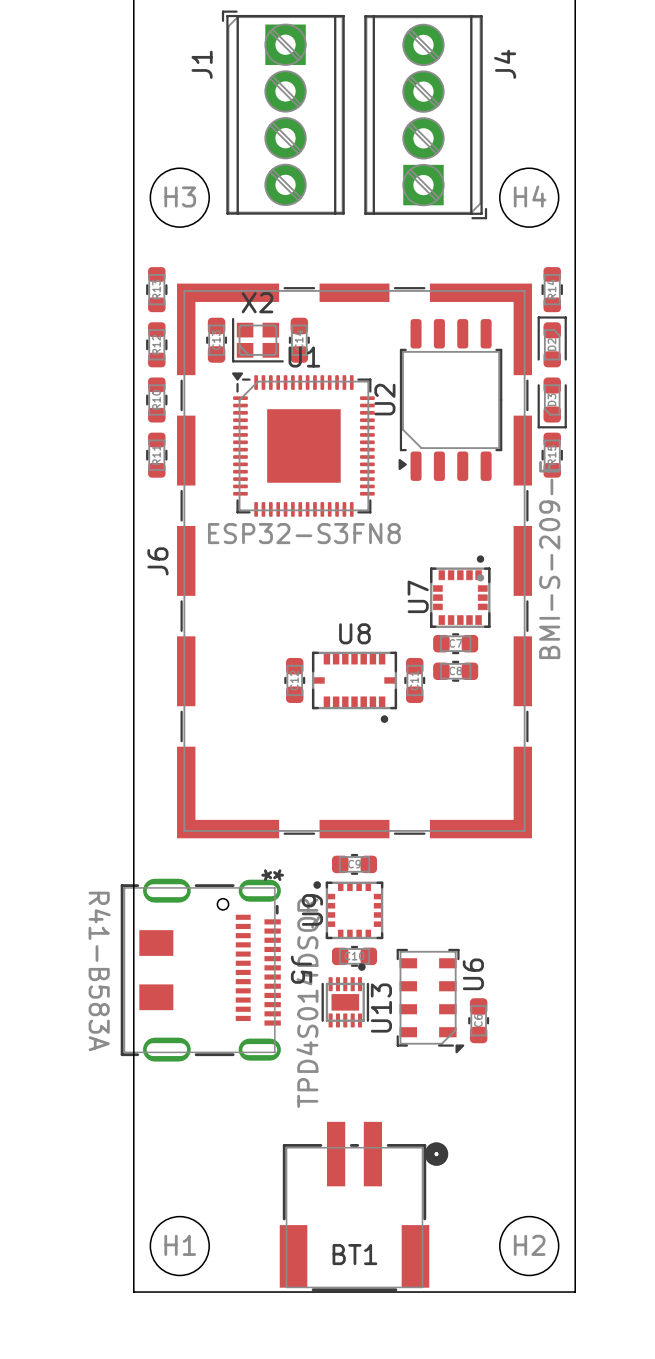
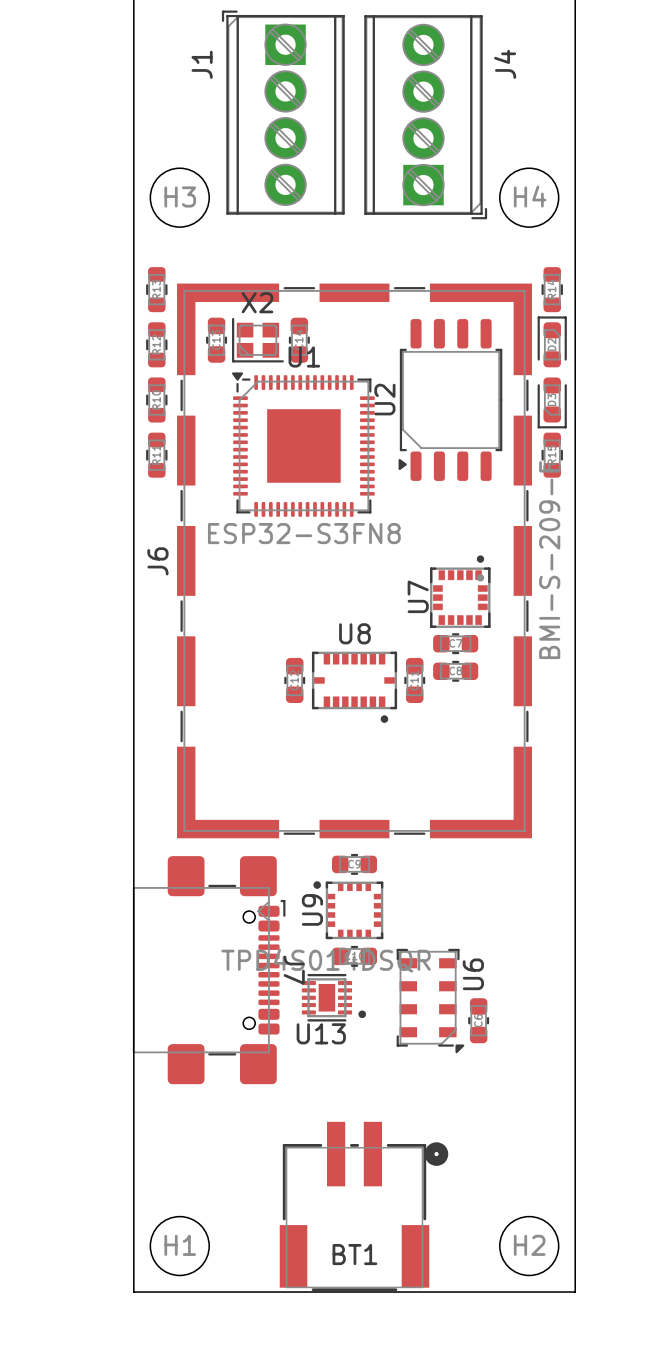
J5: R41-B583A (200, 970) -> none
J7: none -> (209, 970)
U13 rotation: 0° (345, 995) -> 90° clockwise (333, 997)

